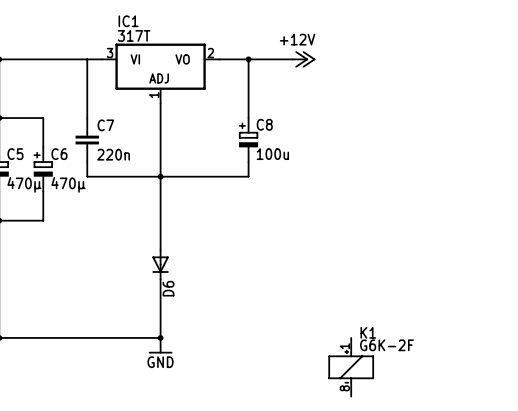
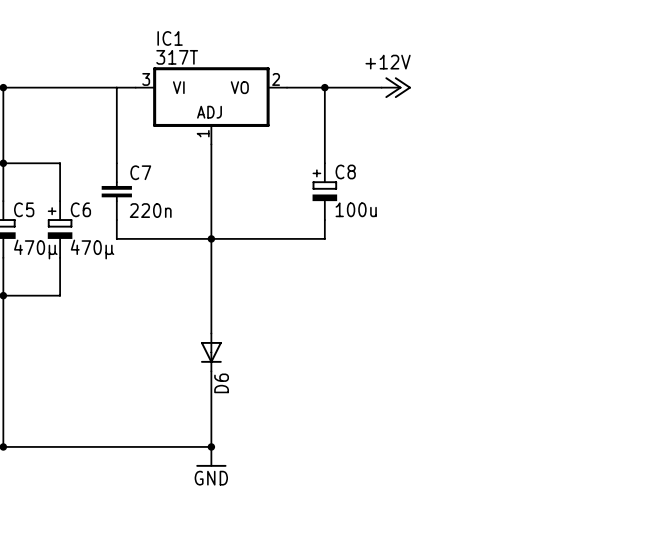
K1: G6K-2F (351, 367) -> none

